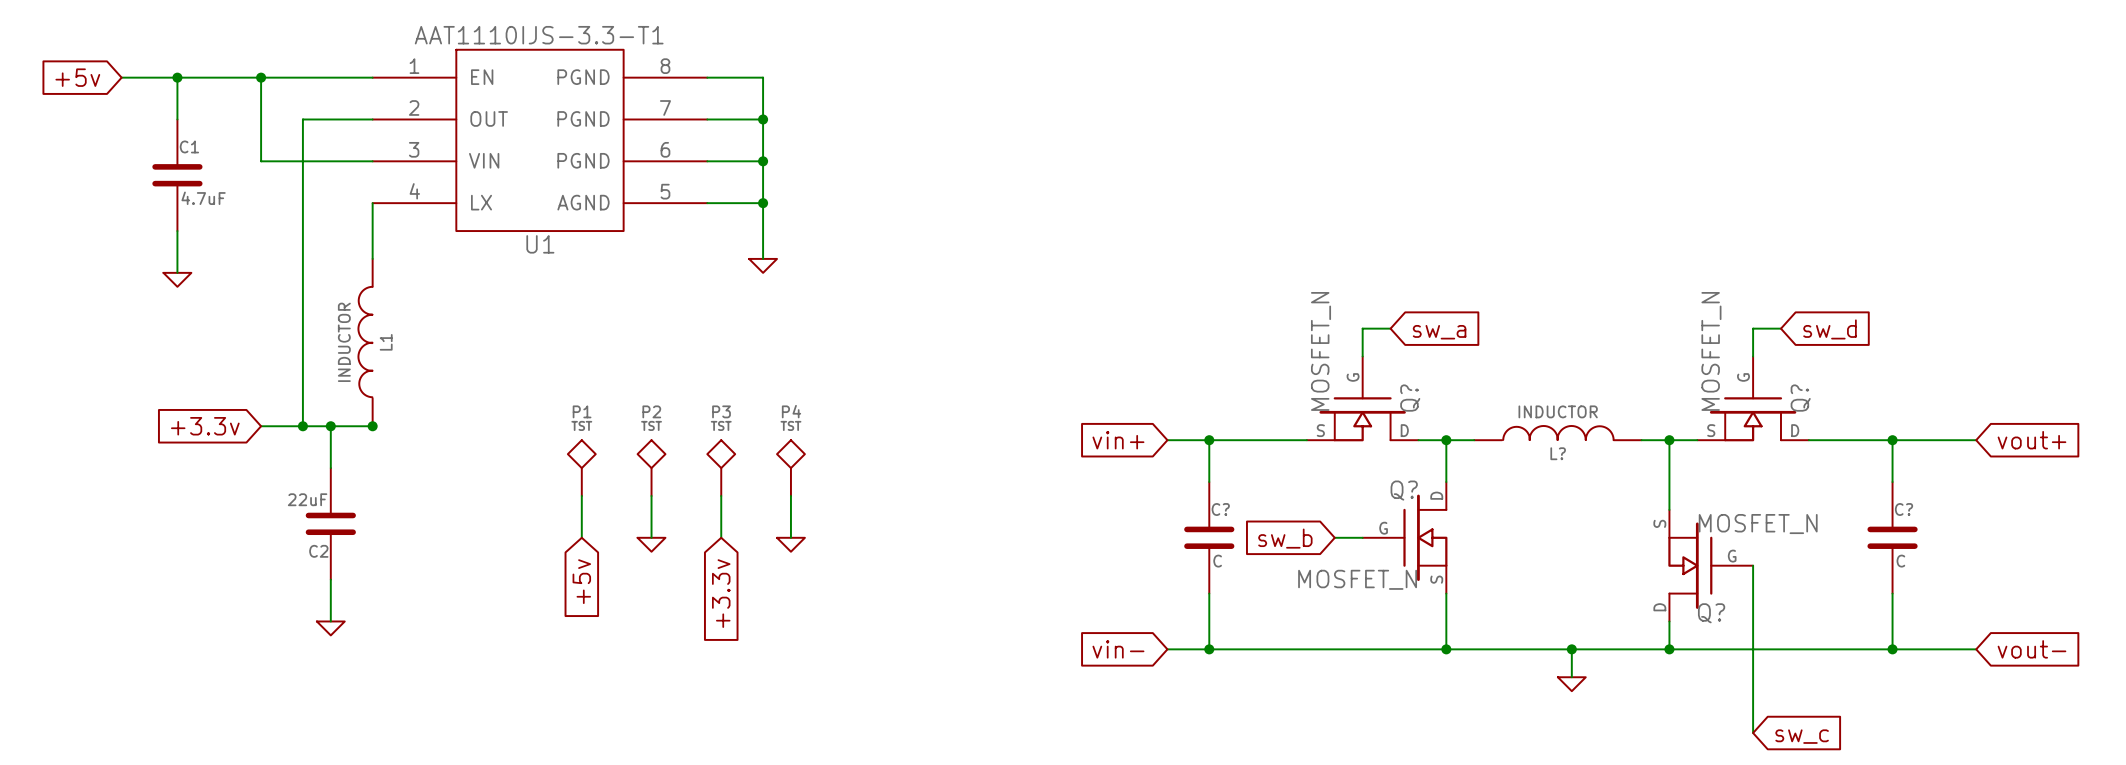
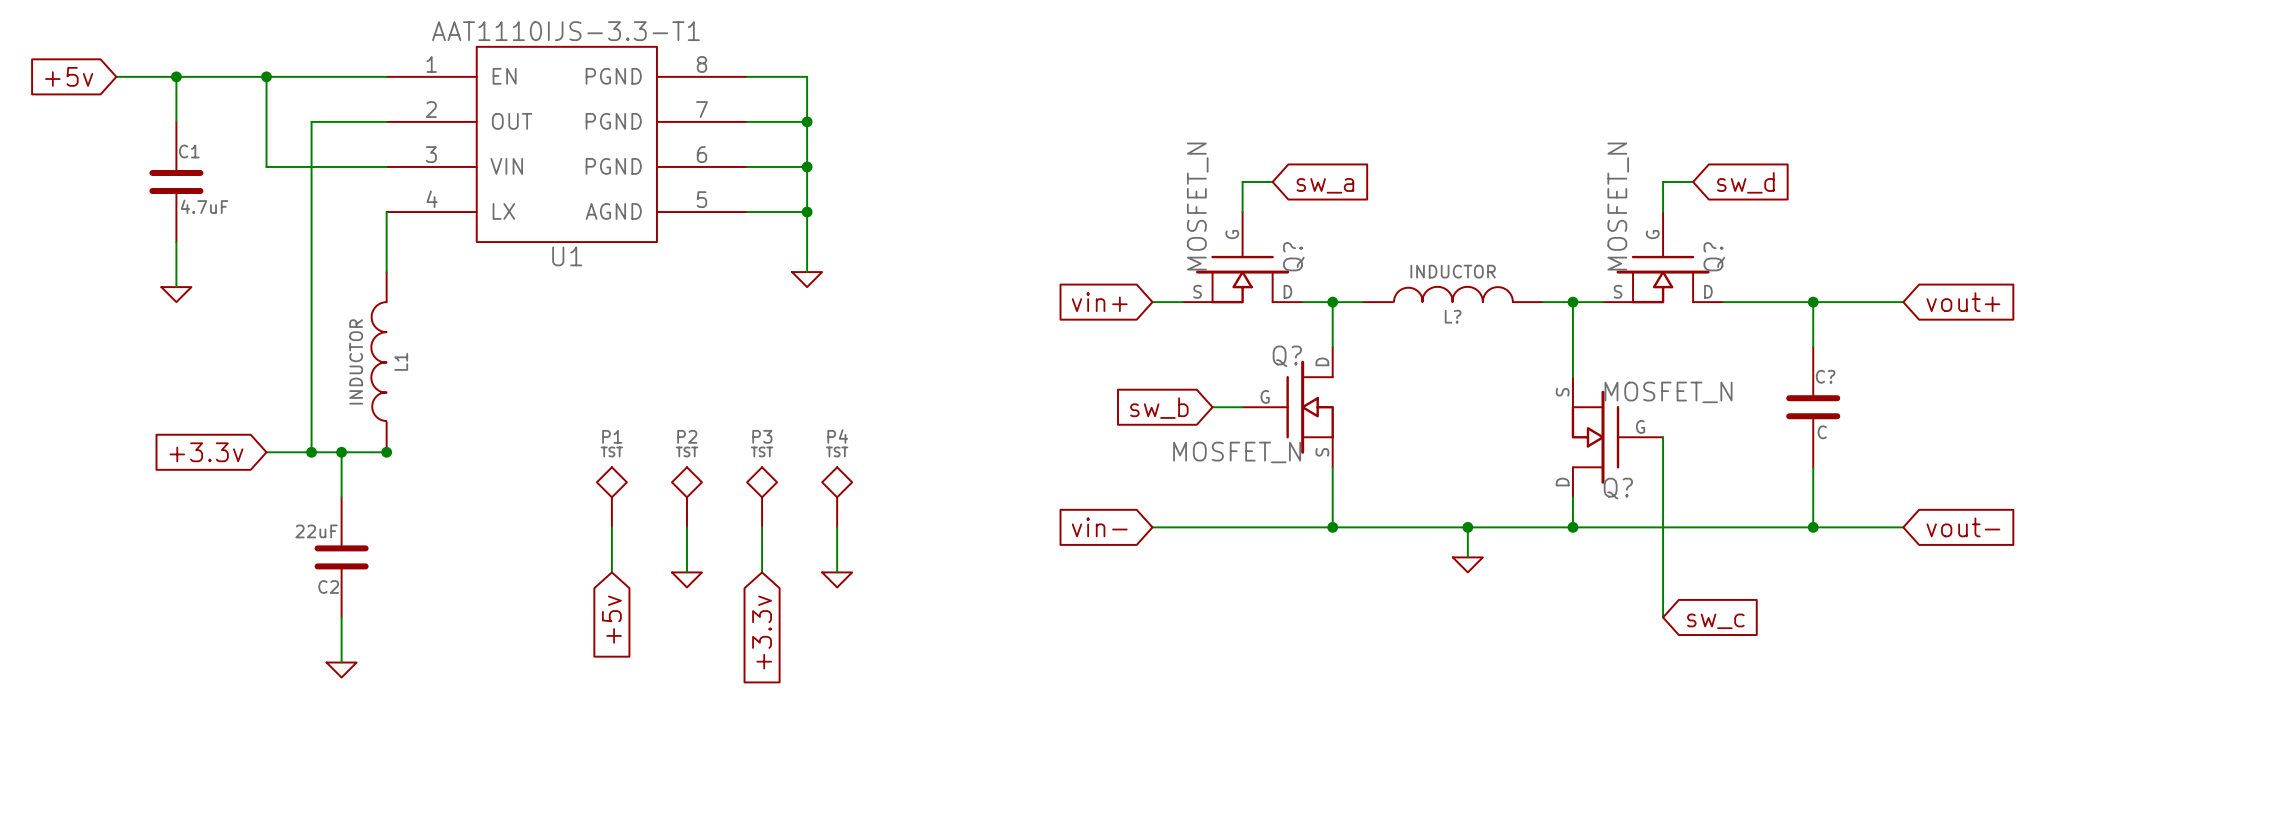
Q?: none -> MOSFET_N (1242, 257)
Q?: none -> MOSFET_N (1663, 257)
wire: none -> (1152, 302) (1182, 302)
junction: none -> (1332, 302)
wire: none -> (1542, 302) (1603, 302)
junction: none -> (1572, 302)
junction: none -> (1813, 302)
wire: (1390, 328) (1362, 328) (1362, 356) -> (1272, 181) (1242, 181) (1242, 212)
wire: (1780, 328) (1753, 328) (1753, 356) -> (1693, 181) (1663, 181) (1663, 212)
global label position: sw_d (1830, 329) -> sw_d (1745, 182)
global label position: sw_a (1439, 332) -> sw_a (1325, 185)
Q?: none -> MOSFET_N (1288, 407)
Q?: MOSFET_N (1362, 398) -> none
Q?: MOSFET_N (1753, 398) -> none
Q?: none -> MOSFET_N (1617, 437)
L? position: (1557, 433) -> (1452, 294)
global label position: vin+ (1118, 440) -> vin+ (1099, 302)
wire: (1167, 440) (1306, 440) -> none
wire: (1209, 440) (1209, 482) -> none
junction: (1209, 440) -> none
wire: (1418, 440) (1474, 440) -> (1302, 302) (1362, 302)
wire: (1446, 440) (1446, 482) -> (1332, 302) (1332, 347)
junction: (1446, 440) -> none
wire: (1641, 440) (1697, 440) -> (1813, 527) (1813, 467)
wire: (1669, 440) (1669, 509) -> (1572, 302) (1572, 377)
junction position: (1669, 440) -> (1813, 527)
wire: (1808, 440) (1976, 440) -> (1723, 302) (1903, 302)
wire: (1892, 440) (1892, 482) -> (1813, 302) (1813, 347)
junction: (1892, 440) -> none
global label position: vout+ (2031, 440) -> vout+ (1963, 302)
wire: none -> (1152, 527) (1903, 527)
junction: none -> (1332, 527)
junction: none -> (1467, 527)
junction: none -> (1572, 527)
C?: C (1209, 537) -> none
wire: (1334, 537) (1362, 537) -> (1212, 407) (1242, 407)
Q?: MOSFET_N (1405, 537) -> none
C? position: (1892, 537) -> (1813, 407)
global label position: sw_b (1285, 538) -> sw_b (1159, 408)
Q?: MOSFET_N (1710, 565) -> none
wire: (1753, 565) (1753, 733) -> (1663, 437) (1663, 617)
wire: (1209, 593) (1209, 649) -> none
wire: (1446, 593) (1446, 649) -> (1332, 467) (1332, 527)
wire: (1892, 593) (1892, 649) -> none
wire: (1669, 621) (1669, 649) -> (1572, 497) (1572, 527)
global label position: vin- (1118, 649) -> vin- (1099, 527)
wire: (1167, 649) (1976, 649) -> none
junction: (1209, 649) -> none
junction: (1446, 649) -> none
wire: (1571, 649) (1571, 677) -> (1467, 527) (1467, 557)
junction: (1571, 649) -> none
junction: (1669, 649) -> none
junction: (1892, 649) -> none
global label position: vout- (2031, 649) -> vout- (1963, 527)
power symbol position: (1571, 684) -> (1467, 564)
global label position: sw_c (1802, 736) -> sw_c (1715, 621)

